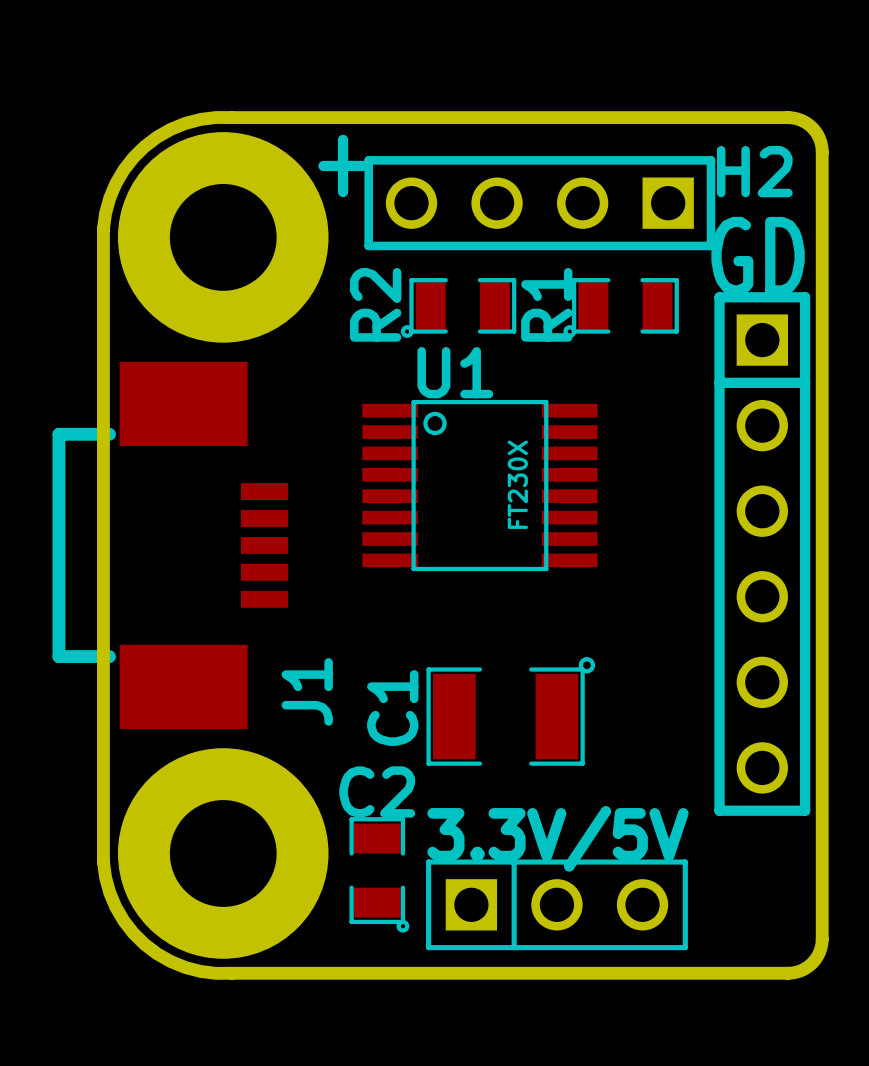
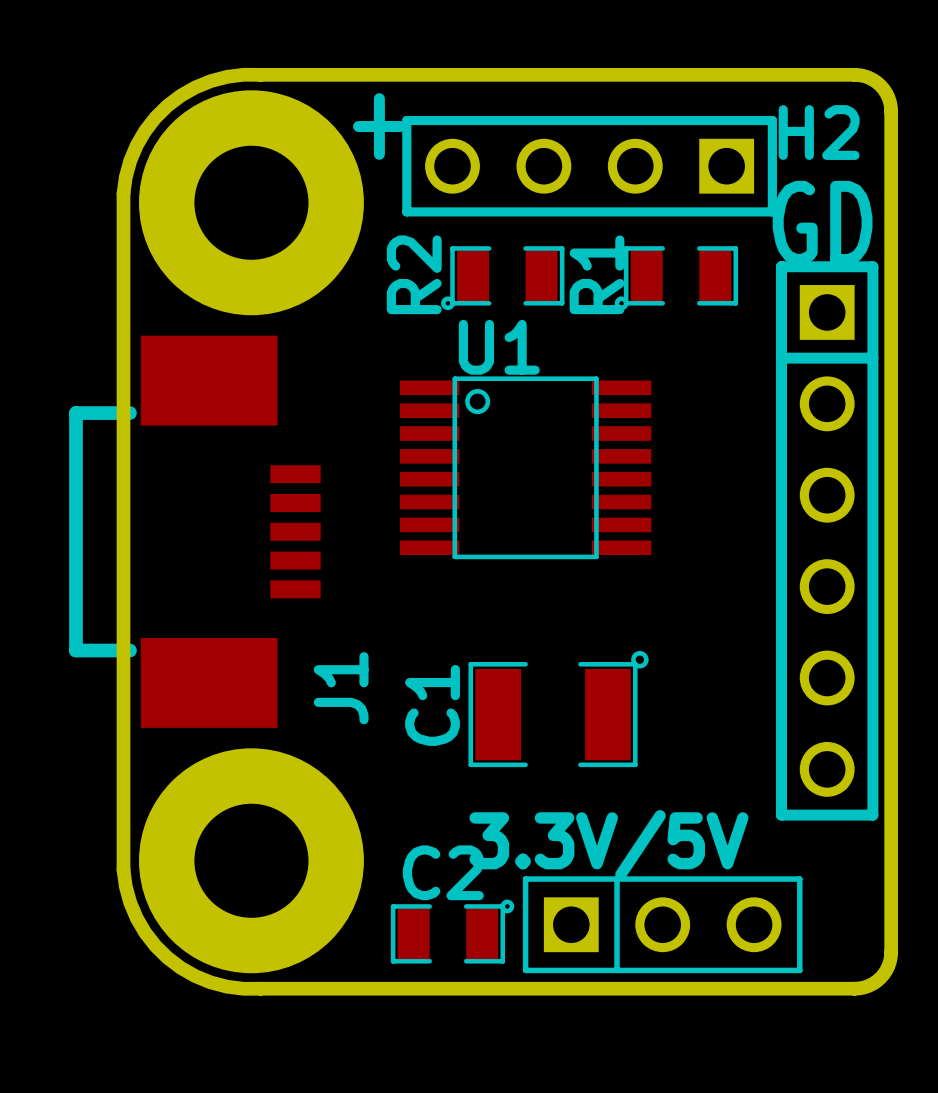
U1 value: FT230X (517, 484) -> none
C2 rotation: 0° (379, 874) -> 90° counterclockwise (452, 931)
part position: (556, 904) -> (662, 924)

